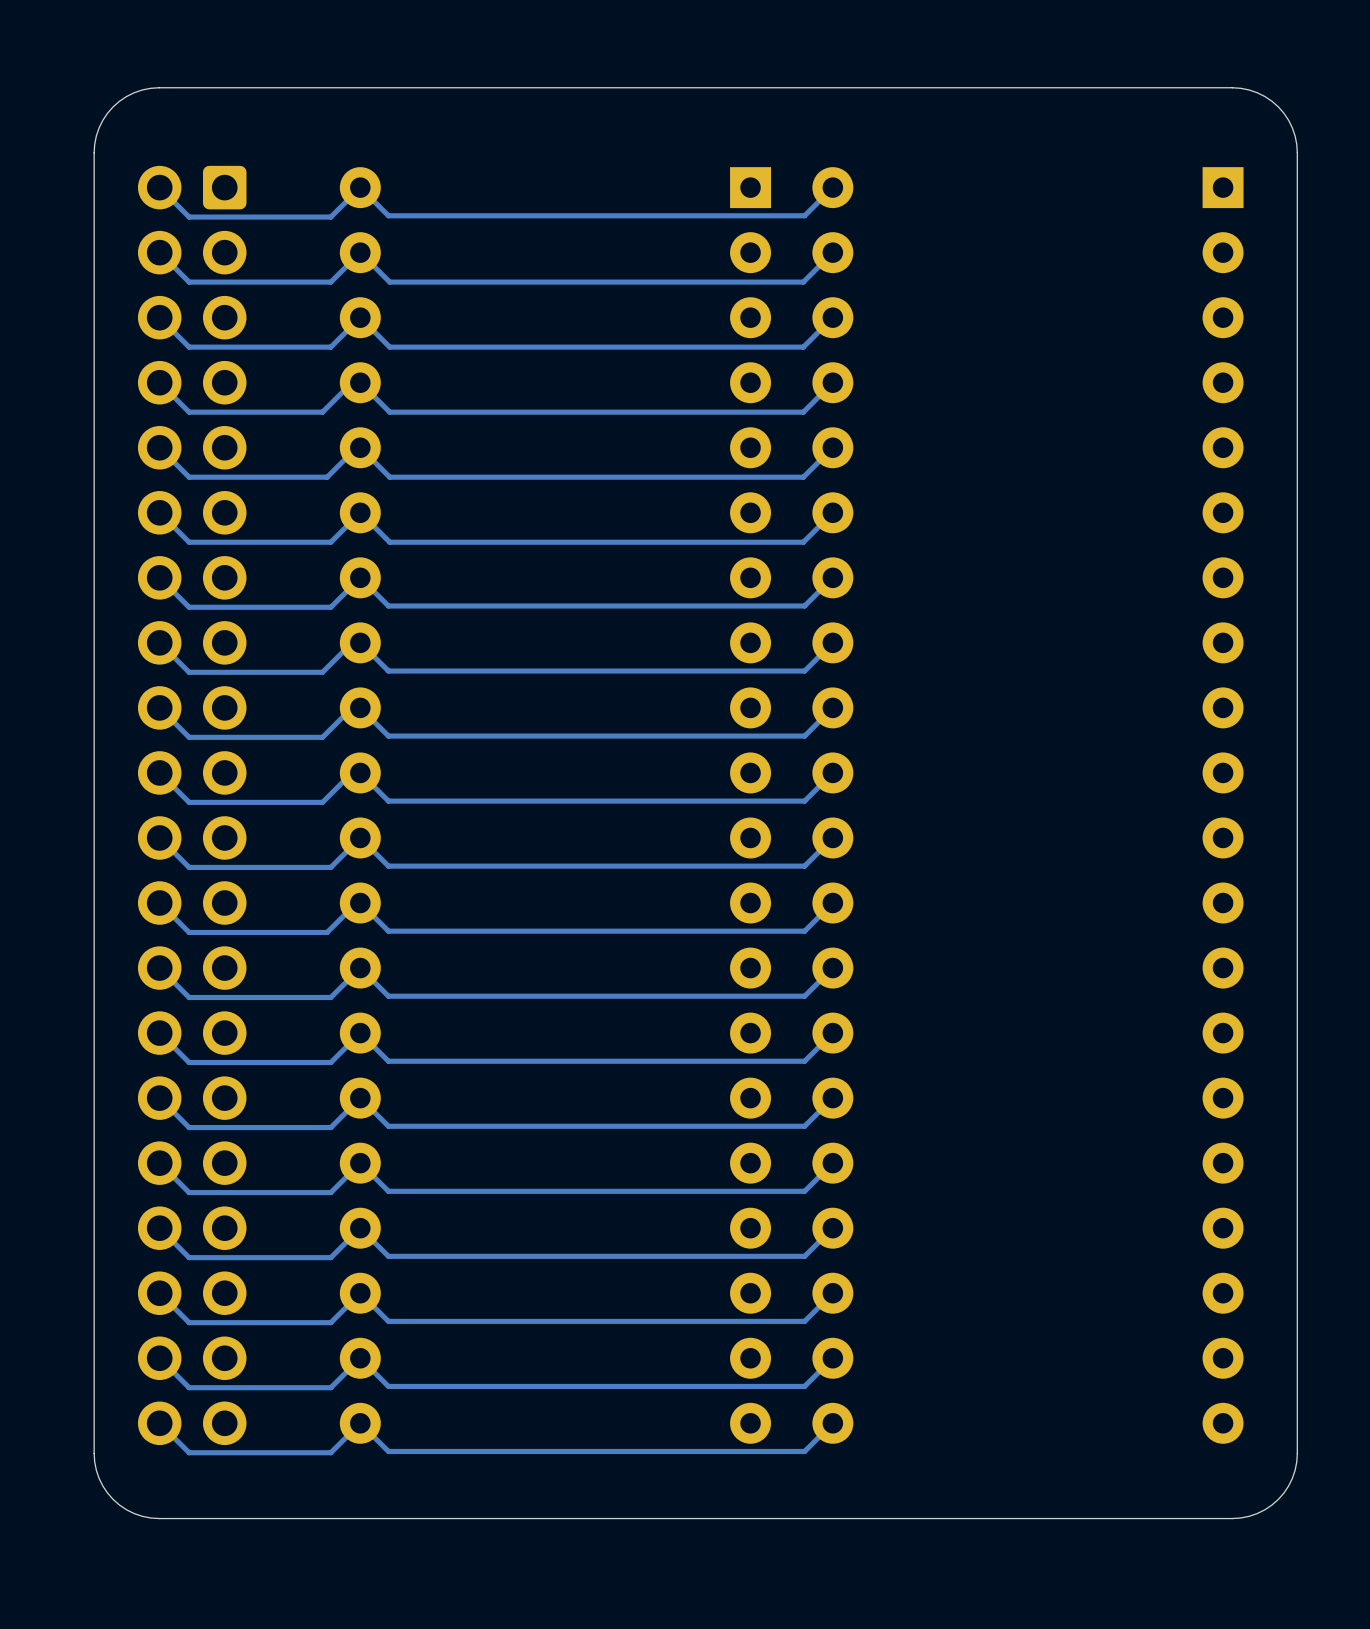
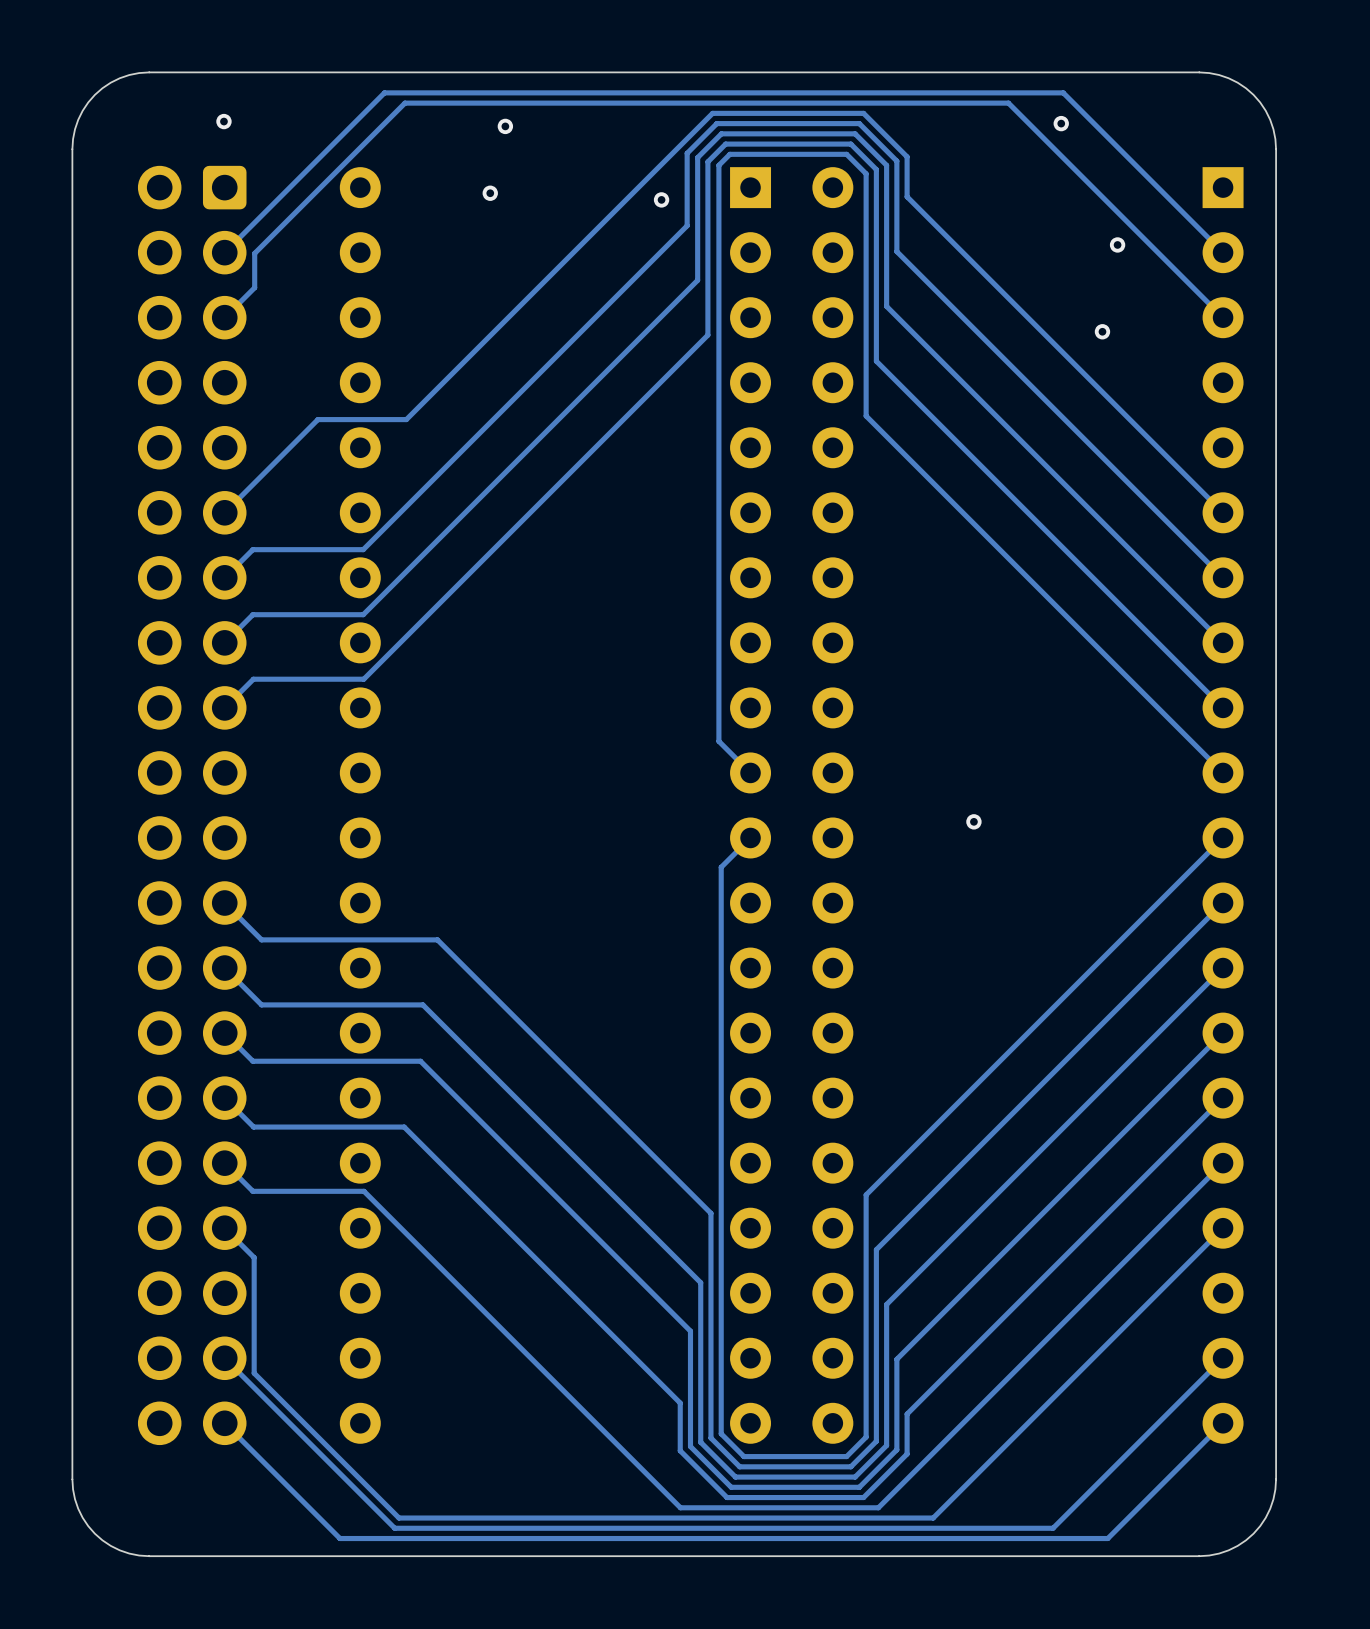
board edge: (1232, 87) (159, 87) (134, 92) (119, 101) (107, 113) (96, 135) (94, 152) (94, 1453) (99, 1478) (107, 1493) (119, 1505) (142, 1516) (159, 1518) (1232, 1518) (1257, 1513) (1271, 1505) (1283, 1493) (1292, 1478) (1297, 1453) (1297, 152) (1292, 127) (1278, 106) (1257, 92) (1232, 87) -> (1199, 72) (1228, 78) (1253, 94) (1270, 119) (1276, 149) (1276, 1479) (1273, 1499) (1260, 1526) (1246, 1540) (1228, 1550) (1199, 1556) (149, 1556) (119, 1550) (102, 1540) (82, 1517) (75, 1499) (72, 1479) (72, 149) (78, 119) (88, 102) (110, 82) (129, 75) (149, 72) (1199, 72)
via: none -> (223, 121)
via: none -> (1061, 123)
via: none -> (505, 126)
track: (832, 187) (804, 215) (388, 215) (360, 187) (330, 217) (189, 217) (159, 187) -> none
via: none -> (490, 193)
via: none -> (661, 199)
via: none -> (1117, 244)
track: (832, 252) (803, 282) (389, 282) (360, 252) (330, 282) (189, 282) (159, 252) -> none
track: none -> (1223, 252) (1063, 92) (384, 92) (224, 252)
track: (832, 317) (803, 347) (389, 347) (360, 317) (330, 347) (189, 347) (159, 317) -> none
track: none -> (1223, 317) (1008, 103) (404, 103) (254, 253) (254, 287) (224, 317)
via: none -> (1102, 331)
track: (832, 382) (803, 412) (389, 412) (360, 382) (351, 382) (322, 412) (189, 412) (159, 382) -> none
track: (832, 447) (803, 477) (389, 477) (360, 447) (356, 447) (327, 477) (189, 477) (159, 447) -> none
track: (832, 512) (803, 542) (389, 542) (360, 512) (330, 542) (189, 542) (159, 512) -> none
track: none -> (1223, 512) (907, 196) (907, 156) (863, 113) (712, 113) (406, 419) (317, 419) (224, 512)
track: (832, 577) (804, 605) (388, 605) (360, 577) (330, 607) (189, 607) (159, 577) -> none
track: none -> (1223, 577) (896, 251) (896, 161) (859, 123) (716, 123) (687, 153) (687, 225) (363, 549) (252, 549) (224, 577)
track: (832, 642) (804, 671) (388, 671) (360, 642) (351, 642) (322, 672) (189, 672) (159, 642) -> none
track: none -> (1223, 642) (886, 306) (886, 165) (855, 133) (721, 133) (697, 157) (697, 280) (363, 614) (252, 614) (224, 642)
track: (832, 707) (804, 736) (388, 736) (360, 707) (351, 707) (322, 737) (189, 737) (159, 707) -> none
track: none -> (1223, 707) (876, 361) (876, 169) (850, 144) (725, 144) (707, 161) (707, 335) (363, 679) (253, 679) (224, 707)
track: (832, 772) (804, 801) (388, 801) (360, 772) (351, 772) (322, 802) (189, 802) (159, 772) -> none
track: none -> (1223, 772) (866, 416) (866, 173) (846, 154) (729, 154) (718, 165) (718, 741) (750, 772)
via: none -> (973, 821)
track: (832, 837) (804, 866) (388, 866) (360, 837) (330, 867) (189, 867) (159, 837) -> none
track: none -> (1223, 837) (866, 1194) (866, 1437) (846, 1456) (743, 1456) (721, 1433) (721, 867) (750, 837)
track: (832, 903) (804, 931) (388, 931) (360, 903) (356, 903) (327, 932) (189, 932) (159, 903) -> none
track: none -> (1223, 903) (876, 1249) (876, 1441) (850, 1466) (739, 1466) (710, 1438) (710, 1213) (437, 939) (261, 939) (224, 903)
track: (832, 968) (804, 996) (388, 996) (360, 968) (330, 997) (189, 997) (159, 968) -> none
track: none -> (1223, 968) (886, 1304) (886, 1445) (855, 1477) (735, 1477) (700, 1442) (700, 1282) (422, 1004) (261, 1004) (224, 968)
track: (159, 1033) (189, 1062) (330, 1062) (360, 1033) (388, 1061) -> (224, 1033) (252, 1061) (388, 1061)
track: (832, 1033) (804, 1061) (420, 1061) -> (1223, 1033) (896, 1359) (896, 1449) (859, 1487) (731, 1487) (690, 1446) (690, 1331) (420, 1061)
track: (832, 1098) (804, 1126) (388, 1126) (360, 1098) (330, 1127) (189, 1127) (159, 1098) -> none
track: none -> (1223, 1098) (907, 1414) (907, 1454) (863, 1497) (727, 1497) (680, 1450) (680, 1403) (404, 1127) (253, 1127) (224, 1098)
track: (832, 1163) (804, 1191) (388, 1191) (360, 1163) (330, 1192) (189, 1192) (159, 1163) -> none
track: none -> (1223, 1163) (878, 1507) (680, 1507) (364, 1191) (252, 1191) (224, 1163)
track: (832, 1228) (804, 1256) (388, 1256) (360, 1228) (330, 1257) (189, 1257) (159, 1228) -> none
track: none -> (1223, 1228) (933, 1518) (398, 1518) (254, 1373) (254, 1257) (224, 1228)
track: (832, 1293) (804, 1321) (388, 1321) (360, 1293) (330, 1322) (189, 1322) (159, 1293) -> none
track: (832, 1358) (804, 1386) (388, 1386) (360, 1358) (330, 1387) (189, 1387) (159, 1358) -> none
track: none -> (1223, 1358) (1053, 1528) (394, 1528) (224, 1358)
track: (832, 1423) (804, 1451) (388, 1451) (360, 1423) (330, 1452) (189, 1452) (159, 1423) -> none
track: none -> (1223, 1423) (1107, 1538) (339, 1538) (224, 1423)

